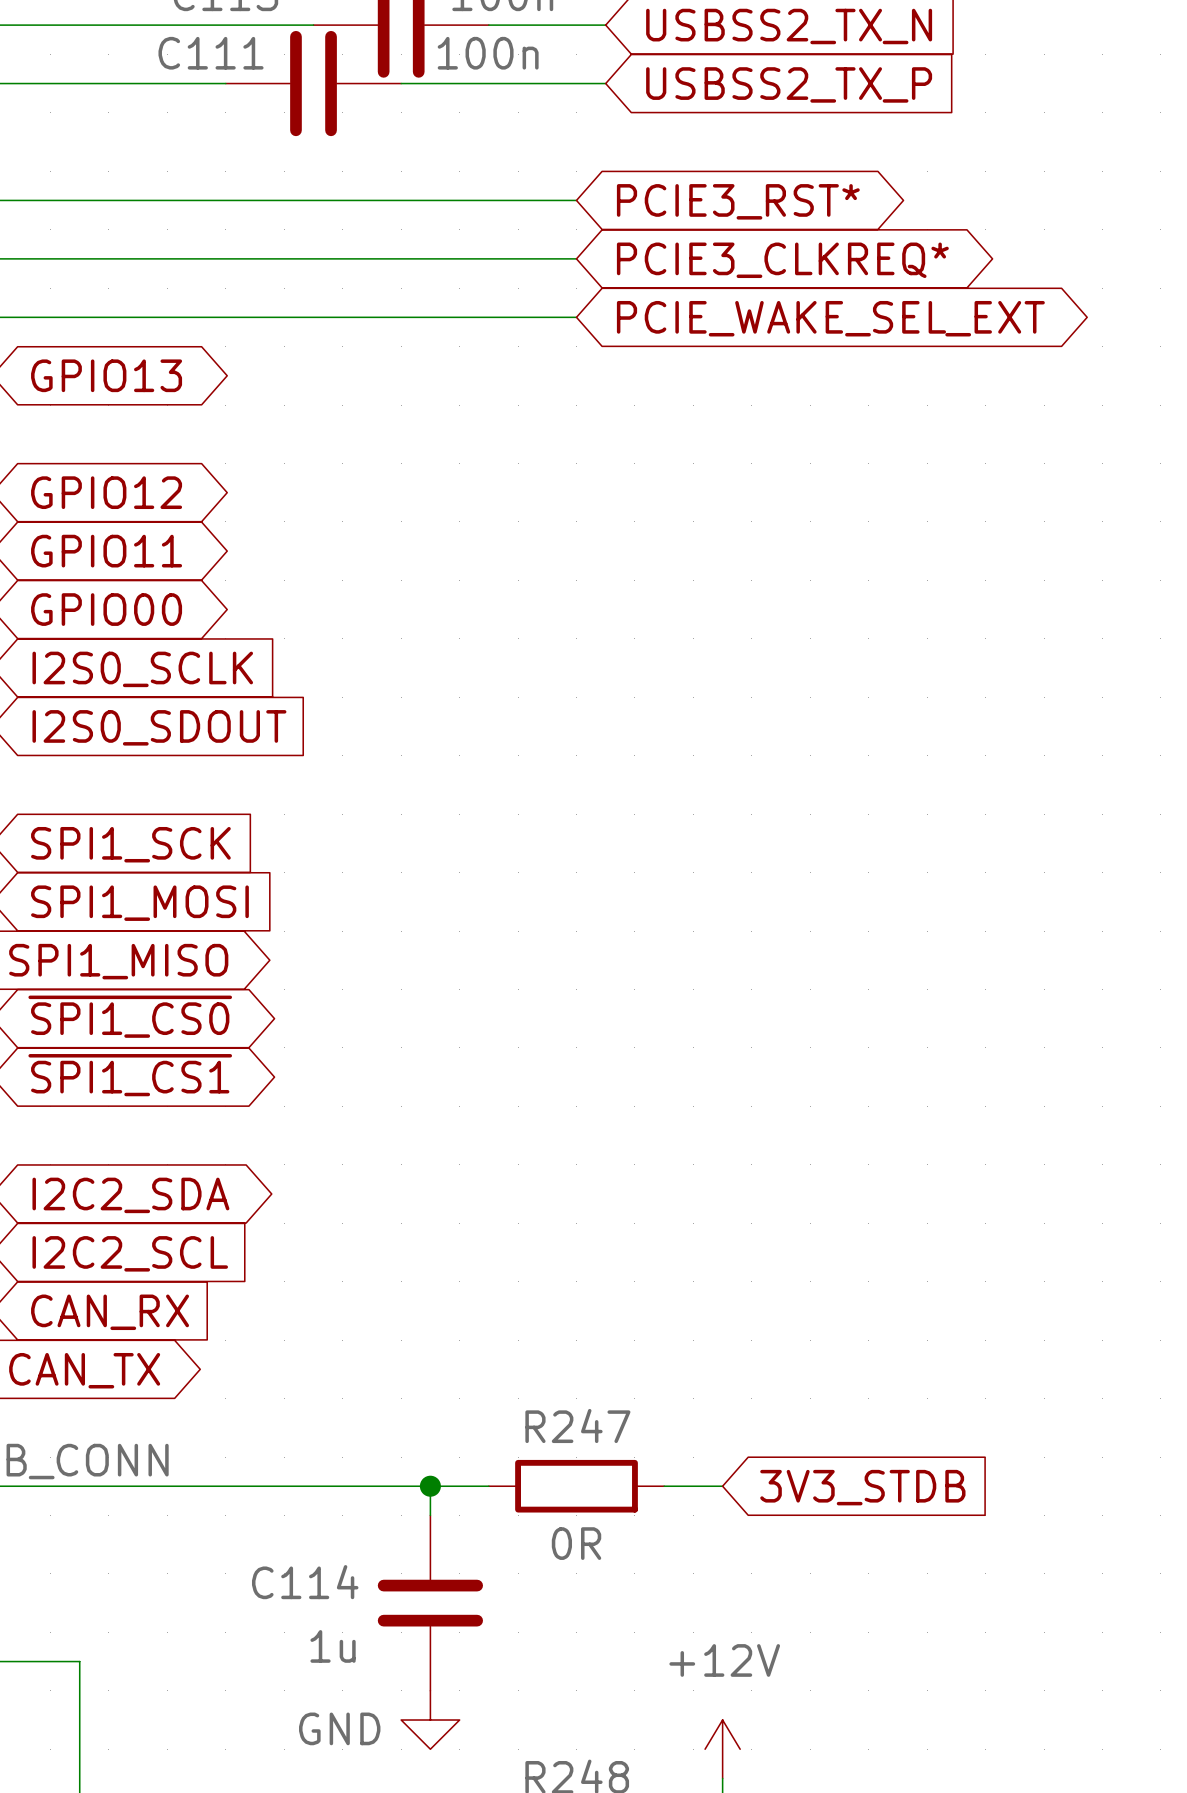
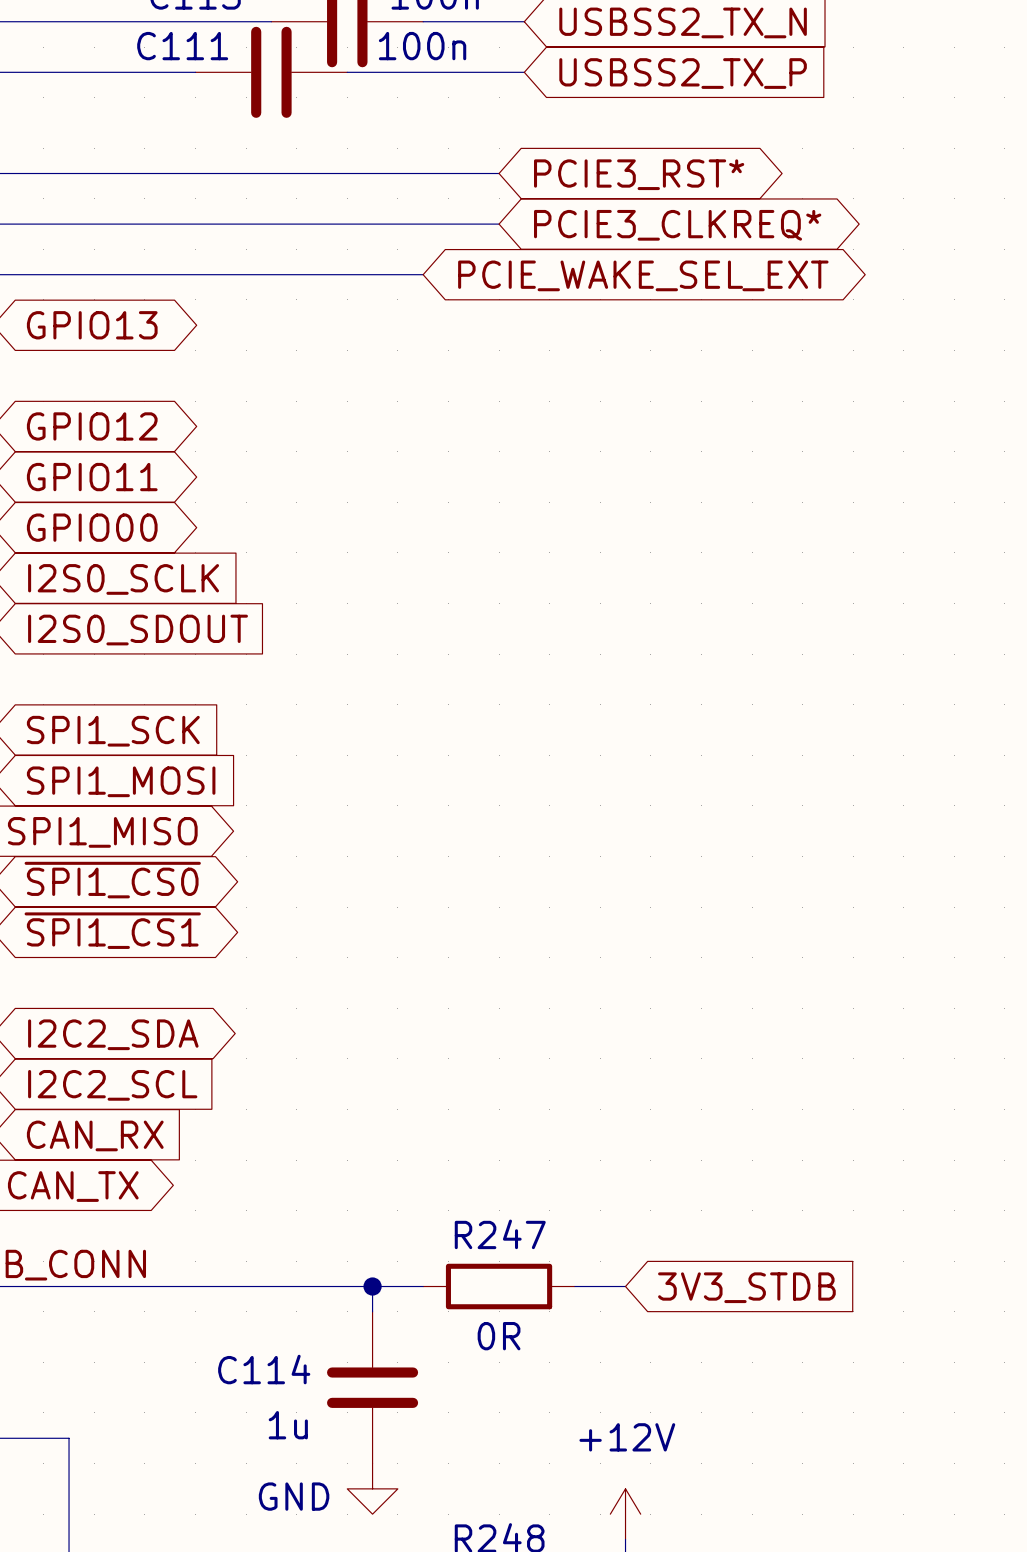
wire: (488, 317) (576, 317) -> none
global label position: PCIE_WAKE_SEL_EXT (830, 318) -> PCIE_WAKE_SEL_EXT (643, 275)

